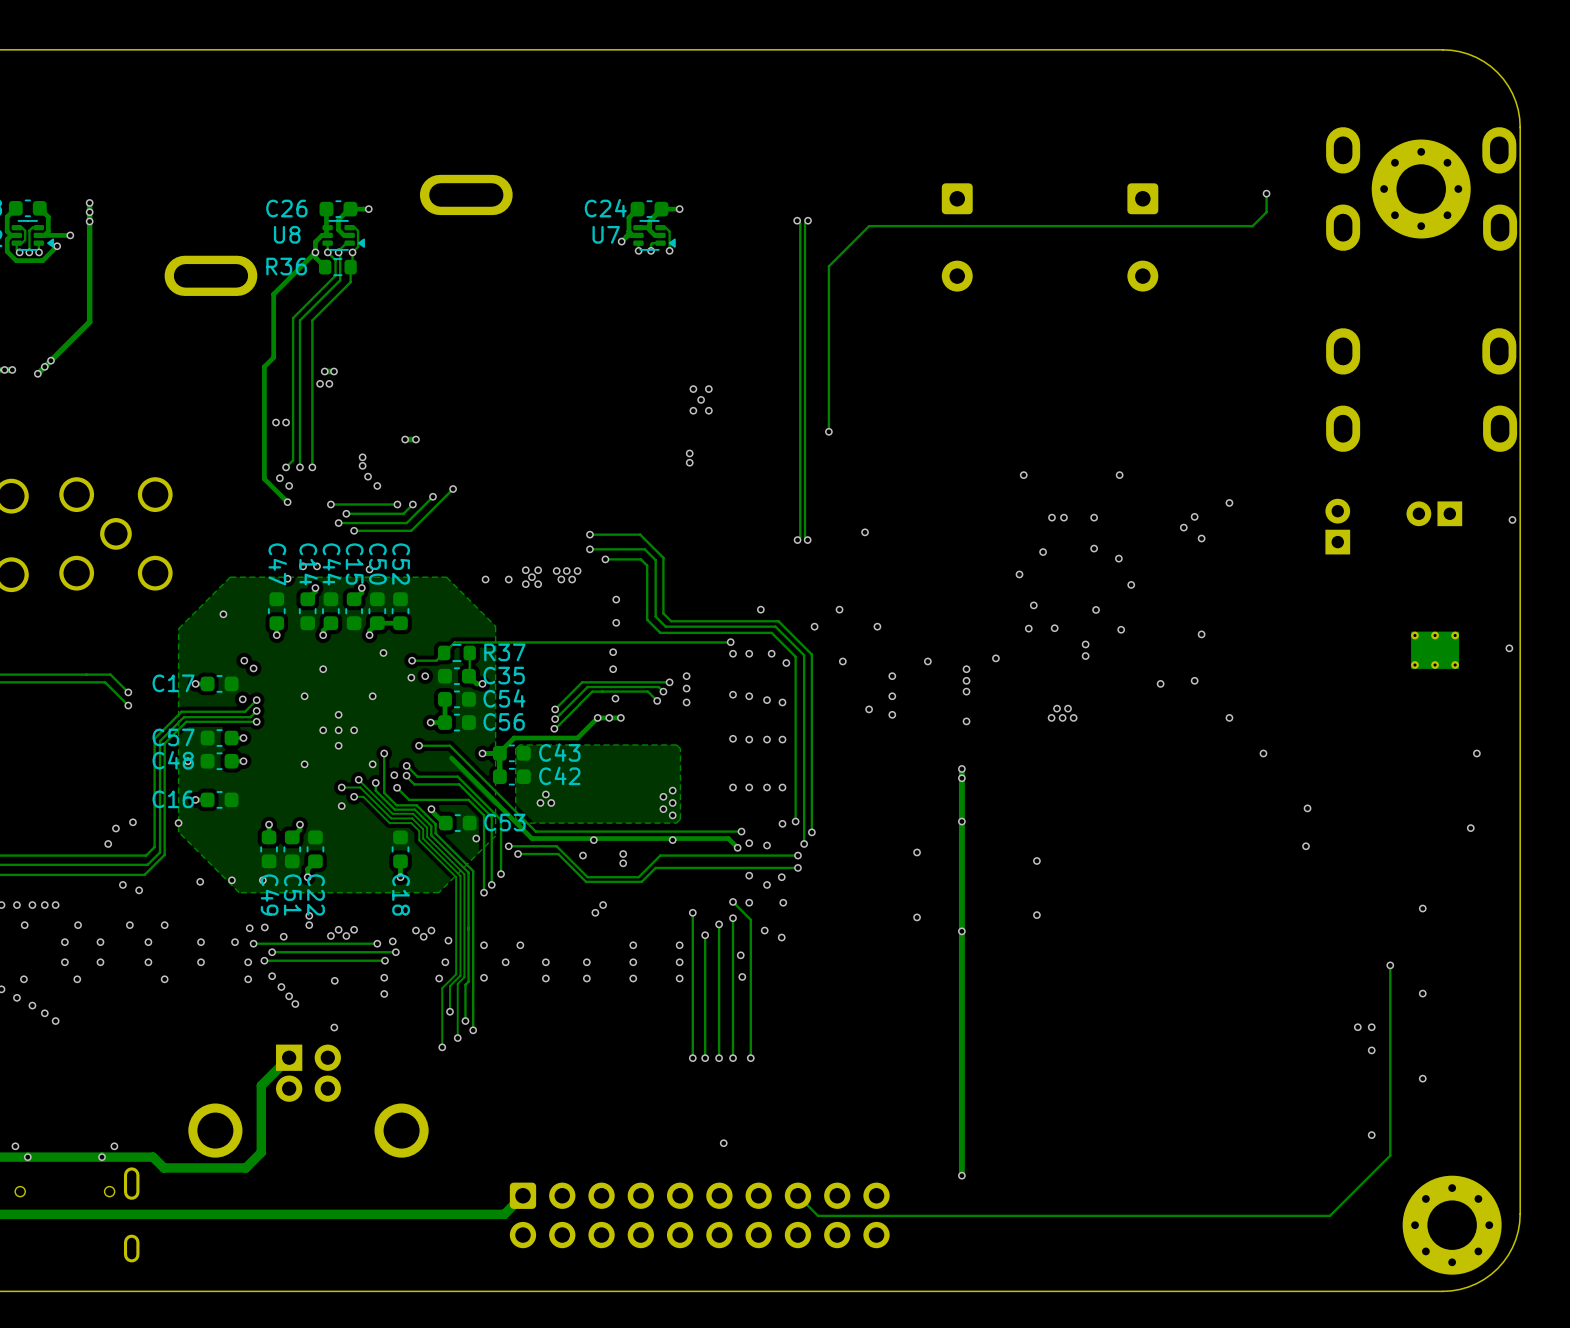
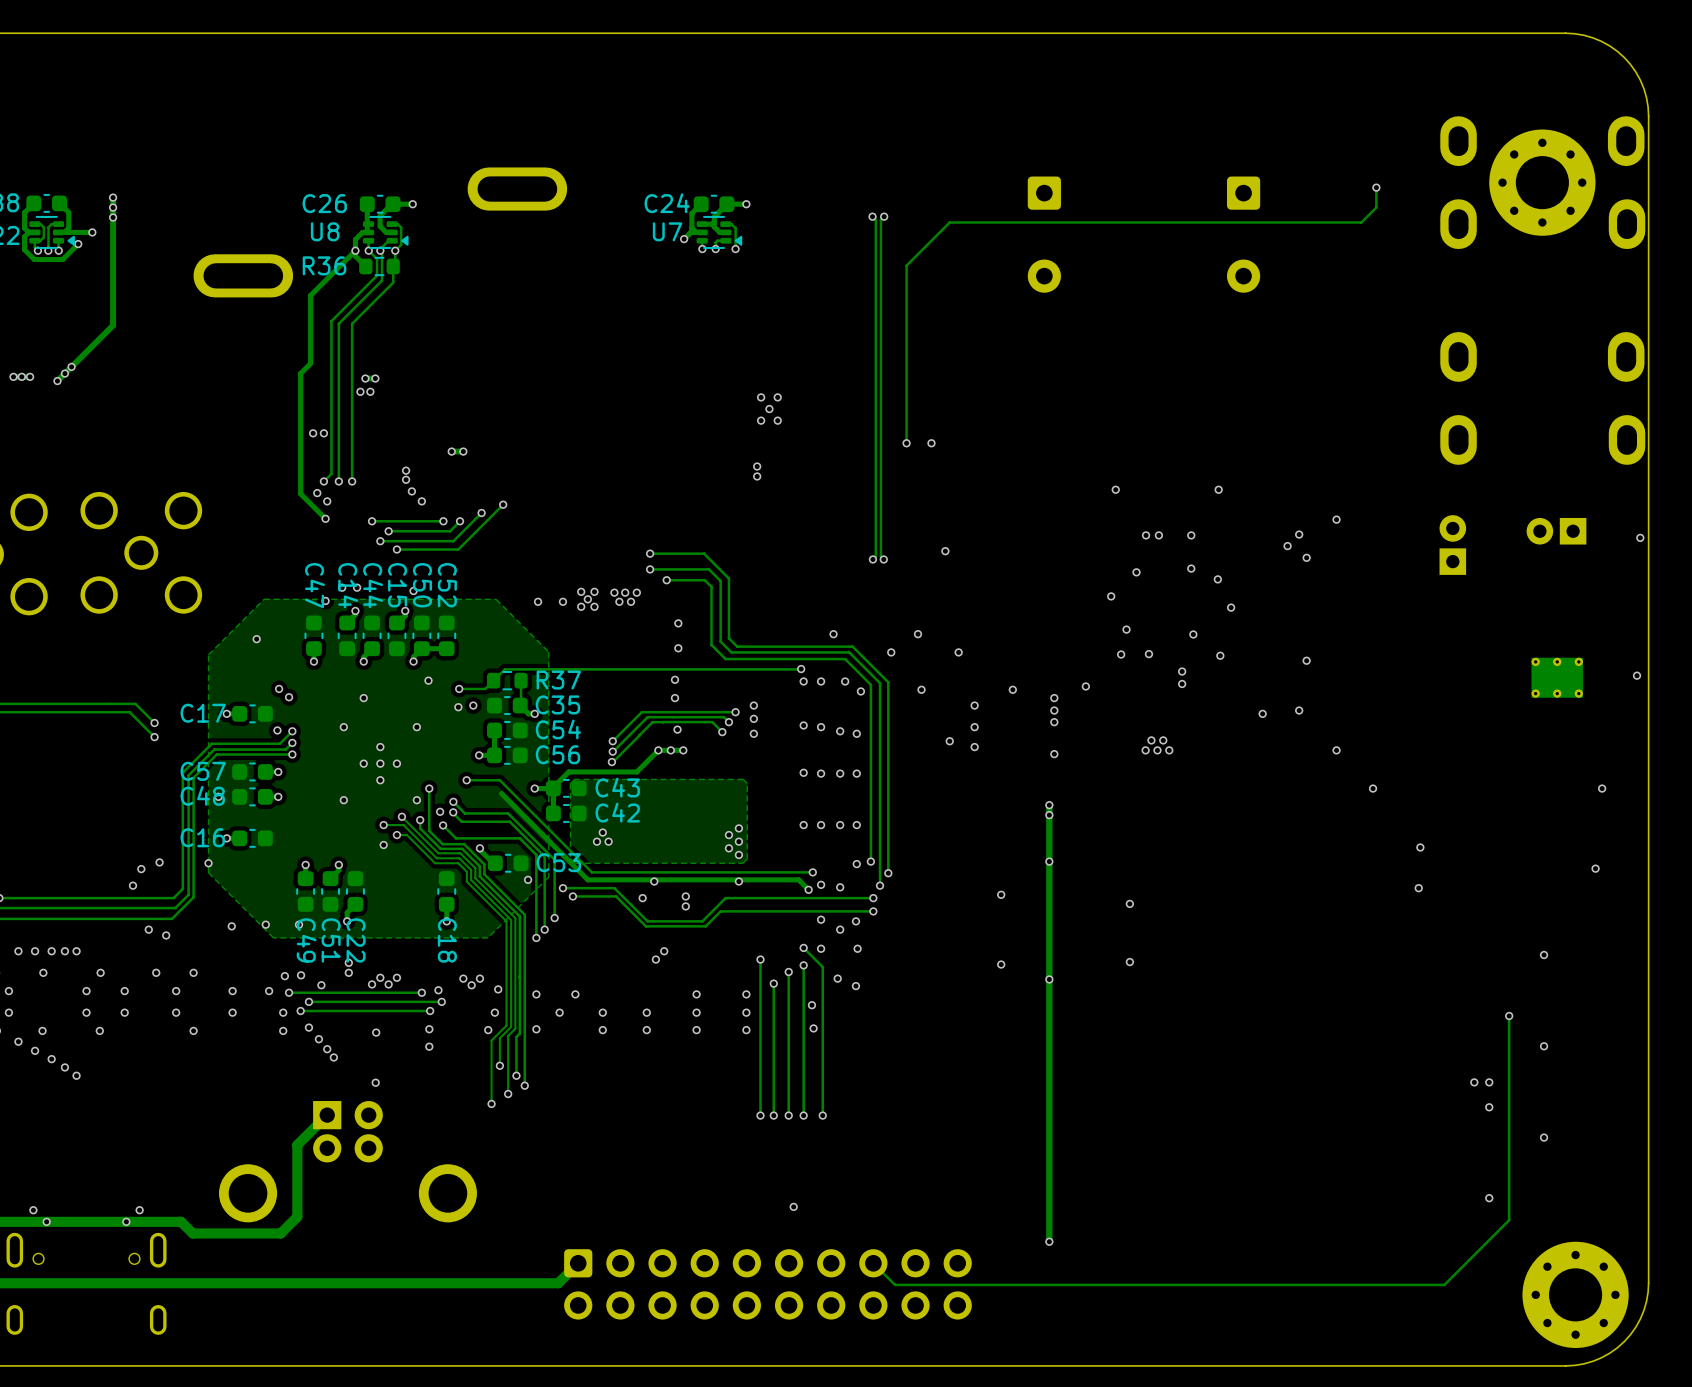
via: none -> (931, 443)

